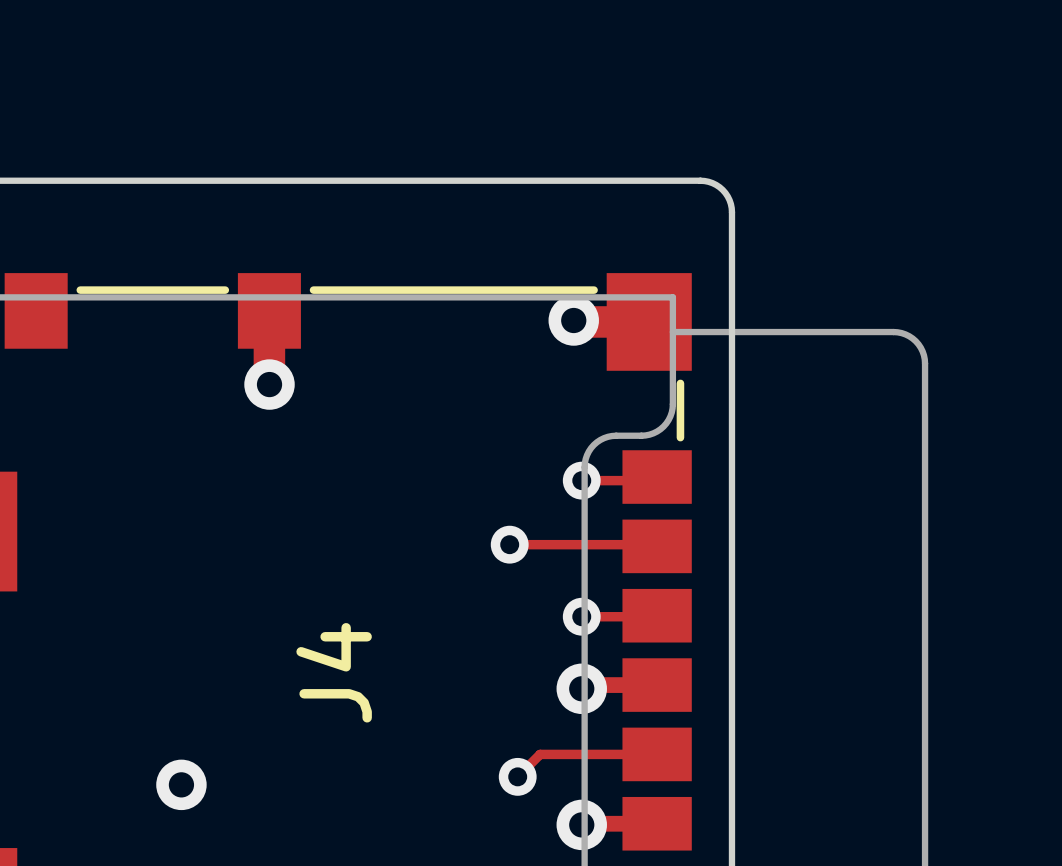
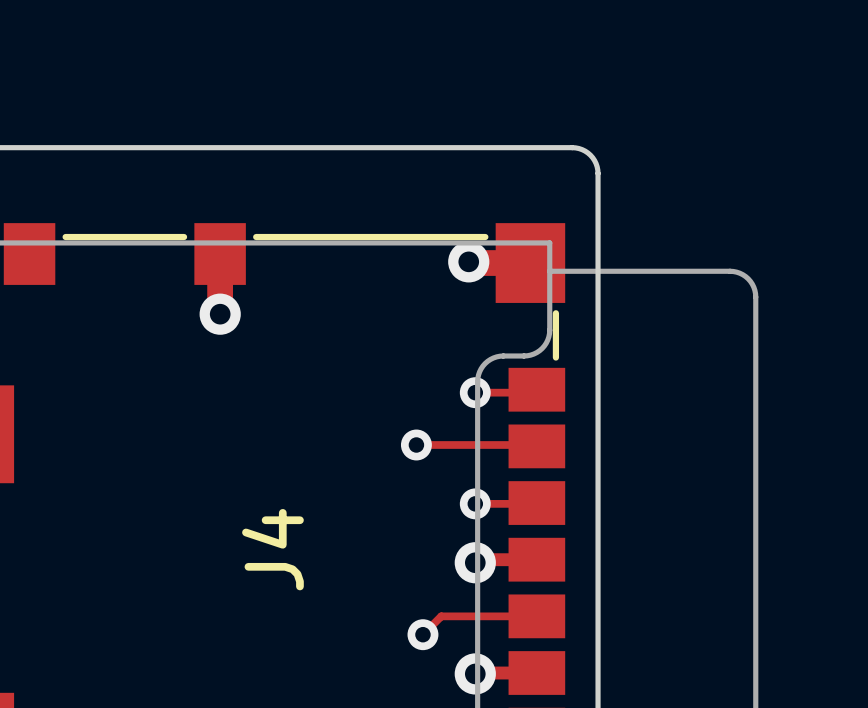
via: (181, 784) -> none

